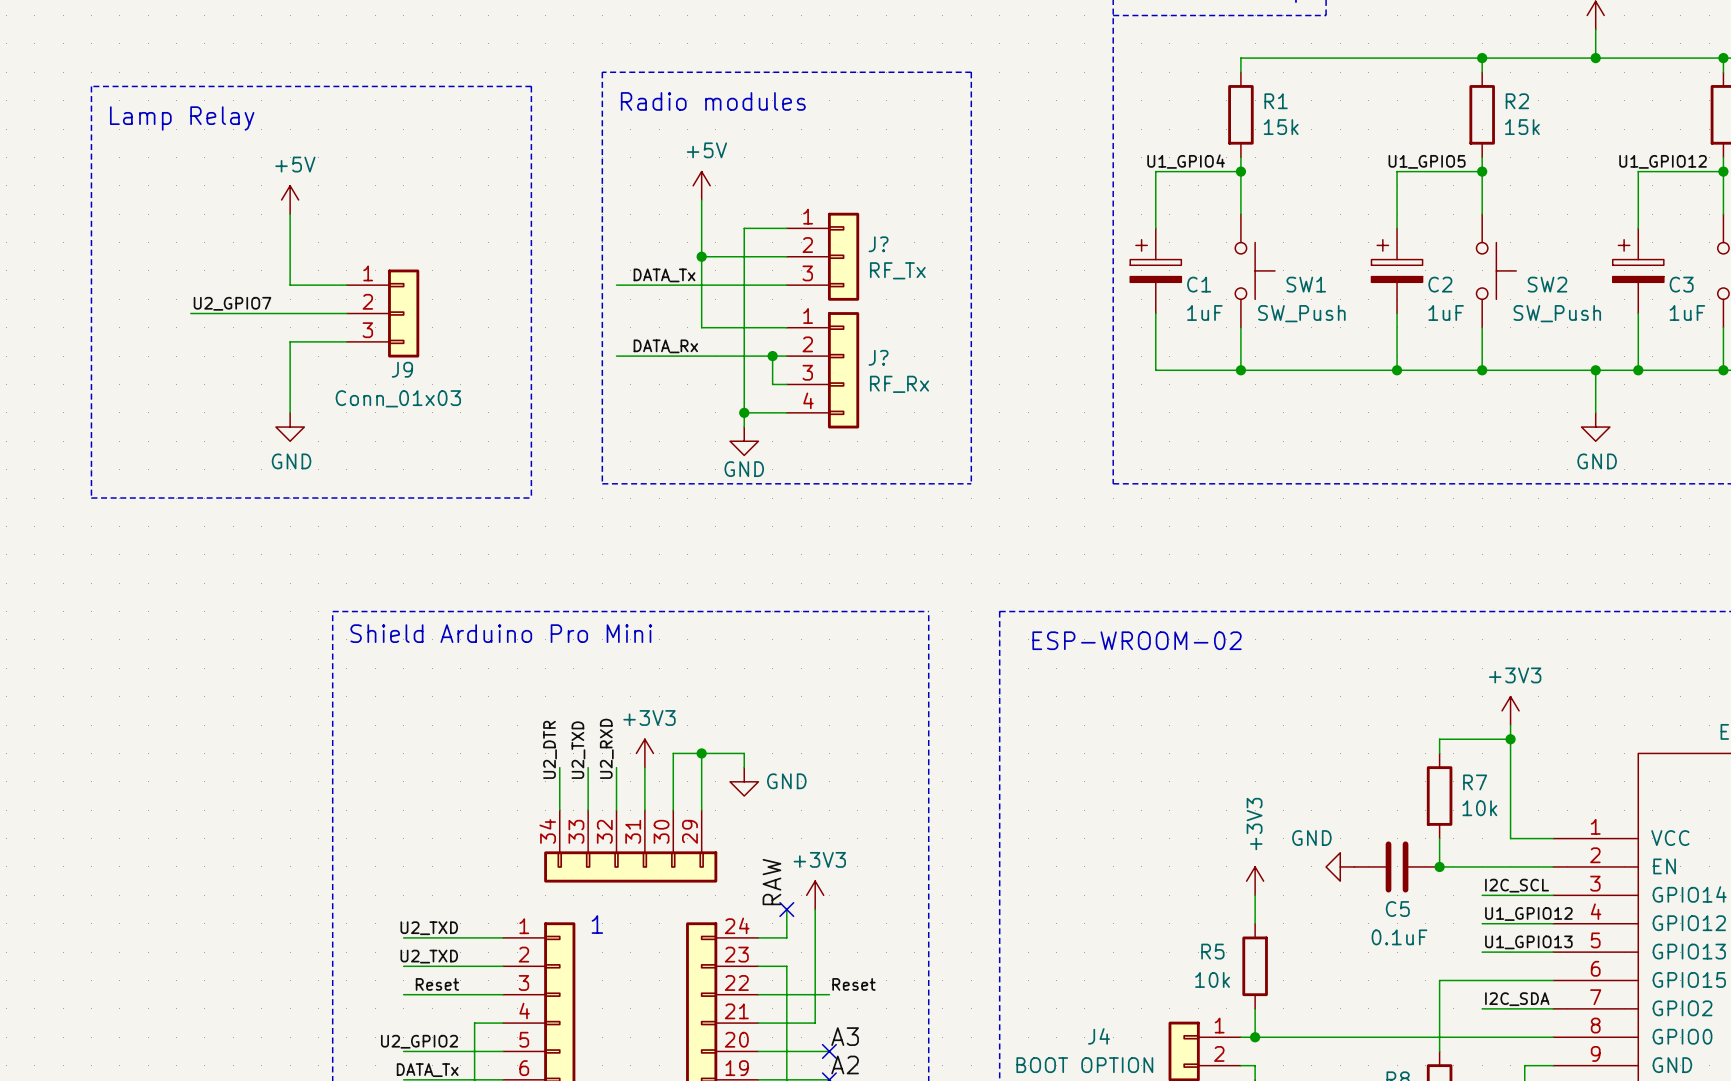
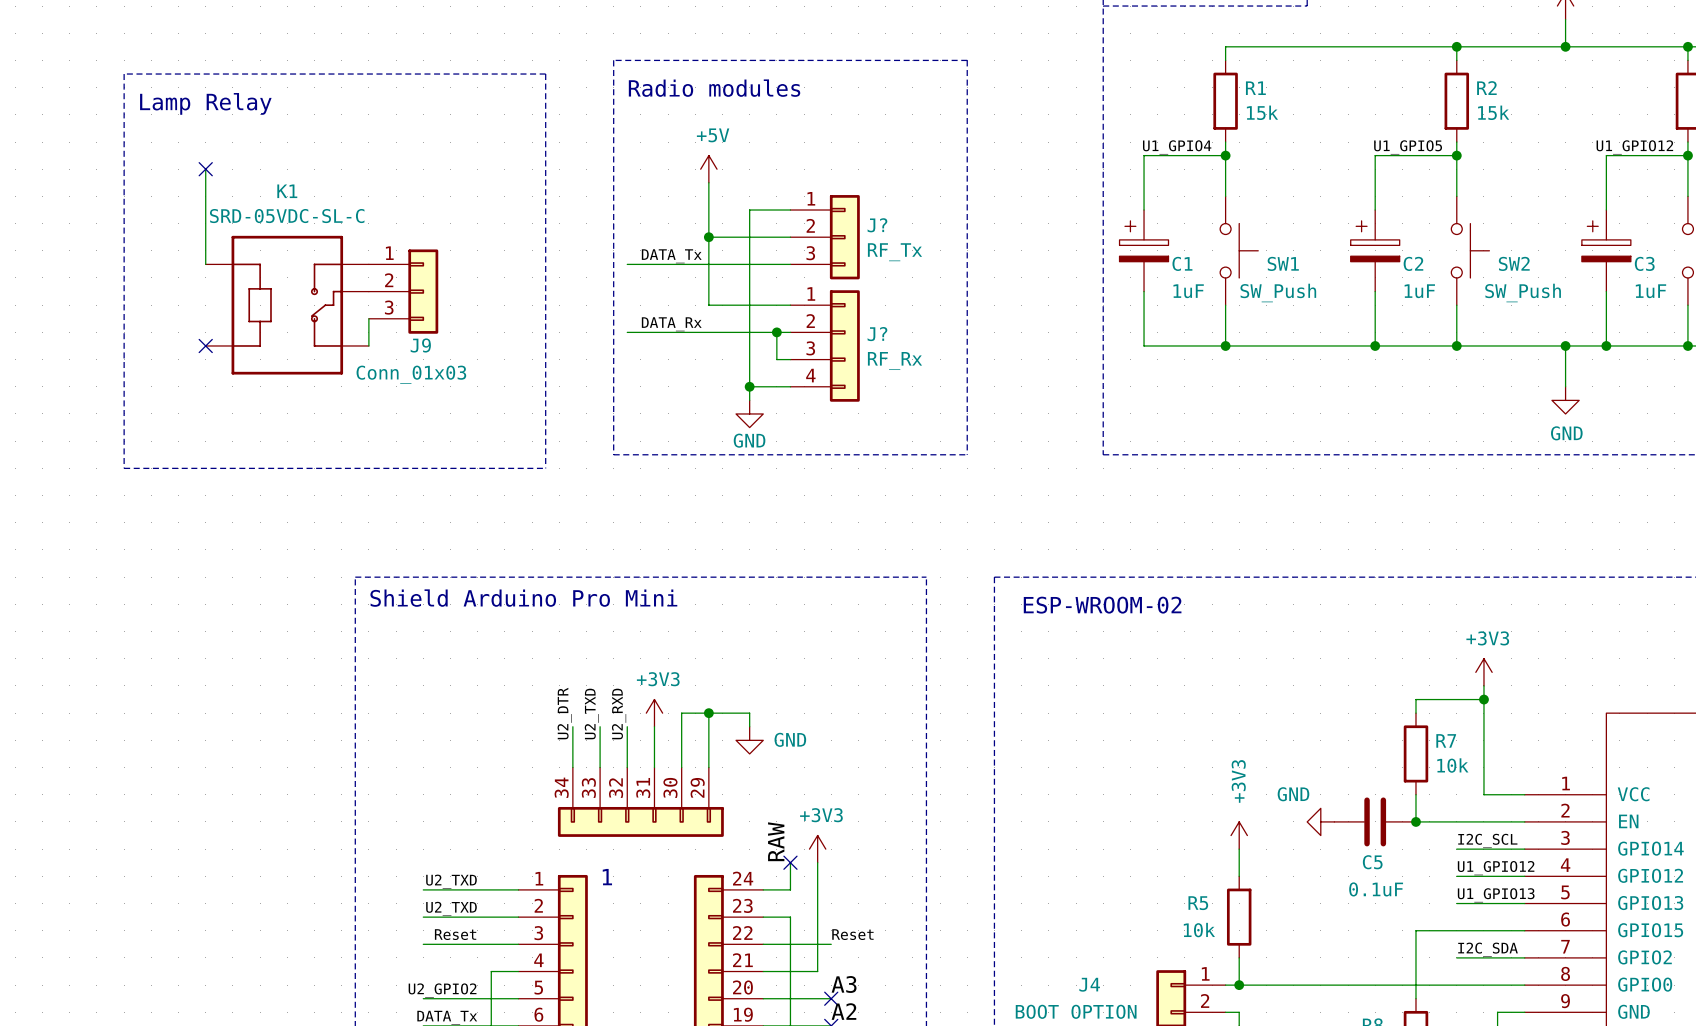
wire: none -> (205, 169) (205, 264)
no-connect mark: none -> (205, 169)
power symbol: +5V (290, 199) -> none
wire: (290, 214) (290, 285) (346, 285) -> none
label: U2_GPIO7 (232, 303) -> none
wire: (190, 313) (346, 313) -> none
K1: none -> SRD-05VDC-SL-C (287, 305)
wire: (346, 341) (290, 341) (290, 412) -> (368, 318) (368, 345)
no-connect mark: none -> (205, 345)
power symbol: GND (290, 427) -> none

